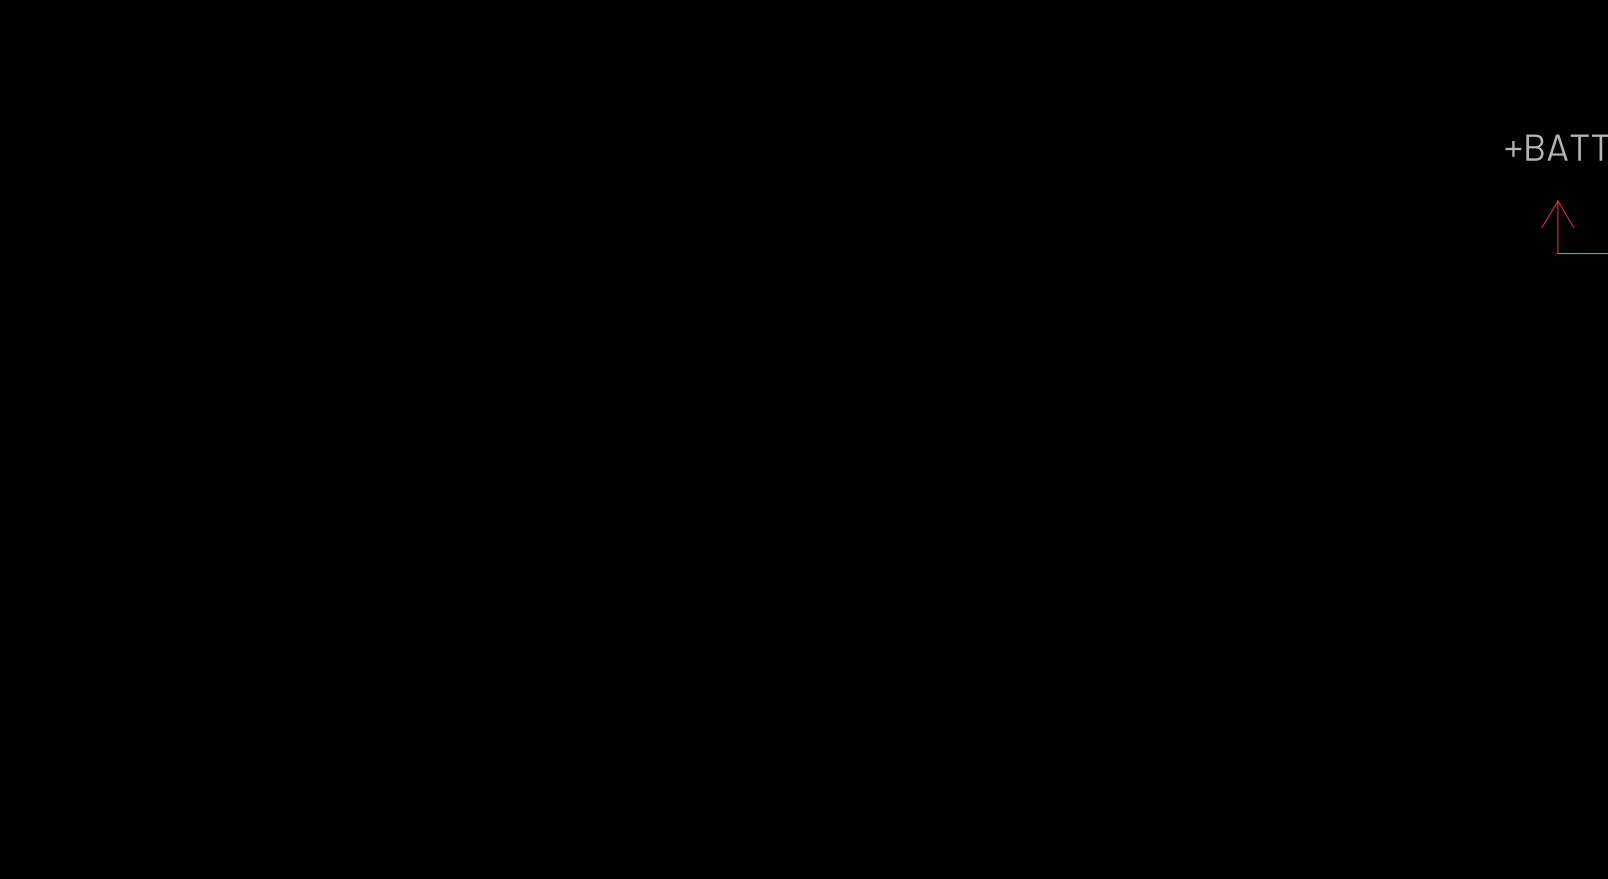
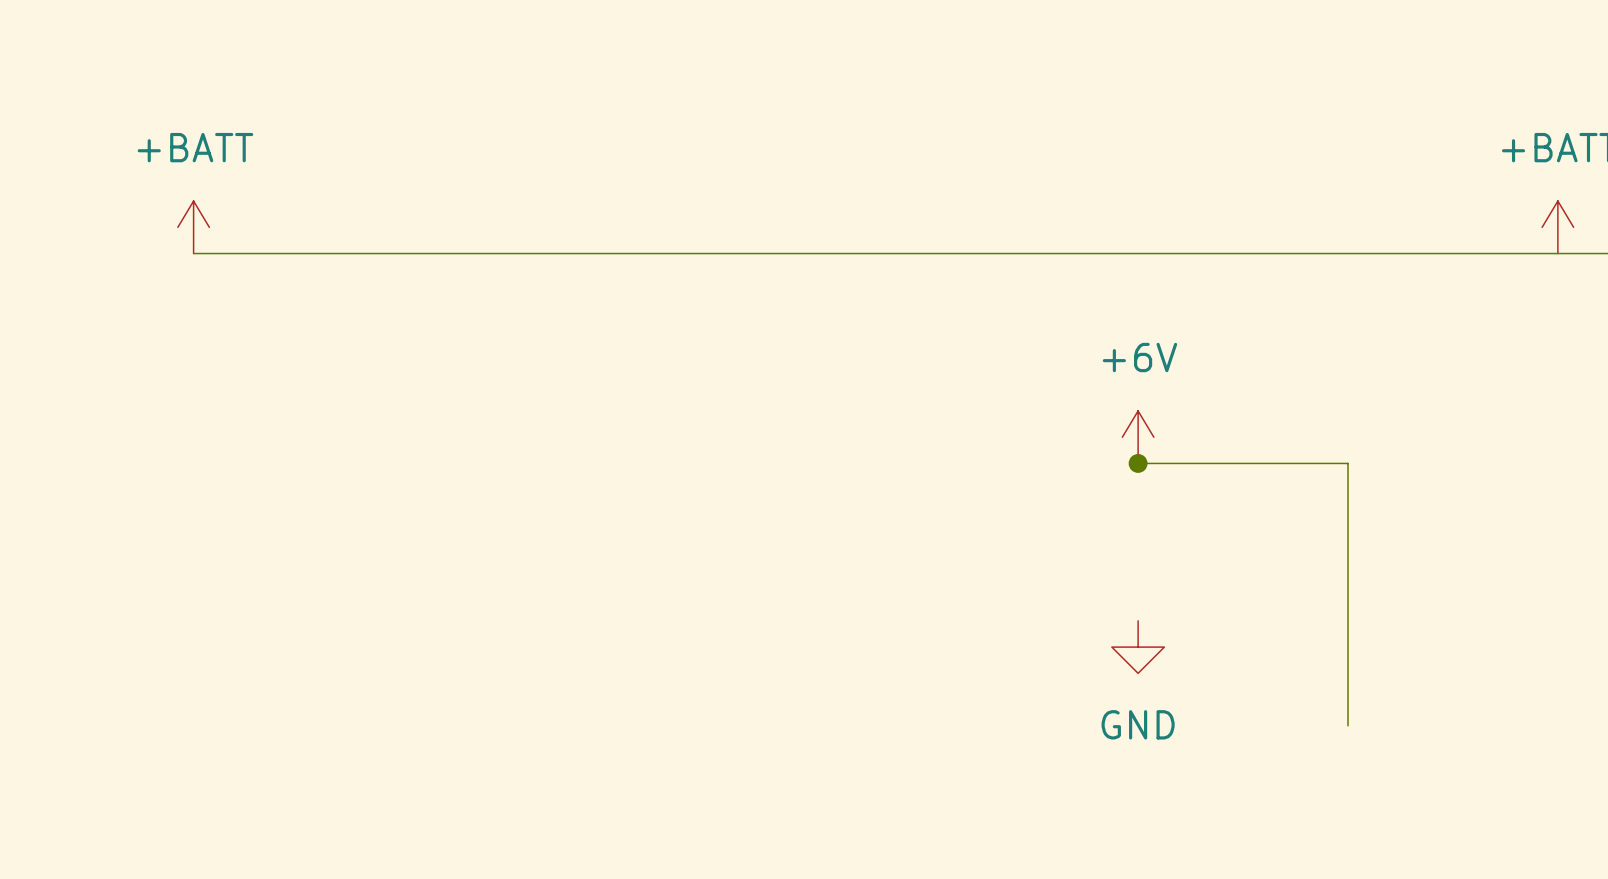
power symbol: none -> +BATT (193, 227)
wire: none -> (193, 253) (1557, 253)
power symbol: none -> +6V (1138, 437)
wire: none -> (1138, 463) (1347, 463) (1347, 725)
junction: none -> (1138, 463)
power symbol: none -> GND (1138, 647)

